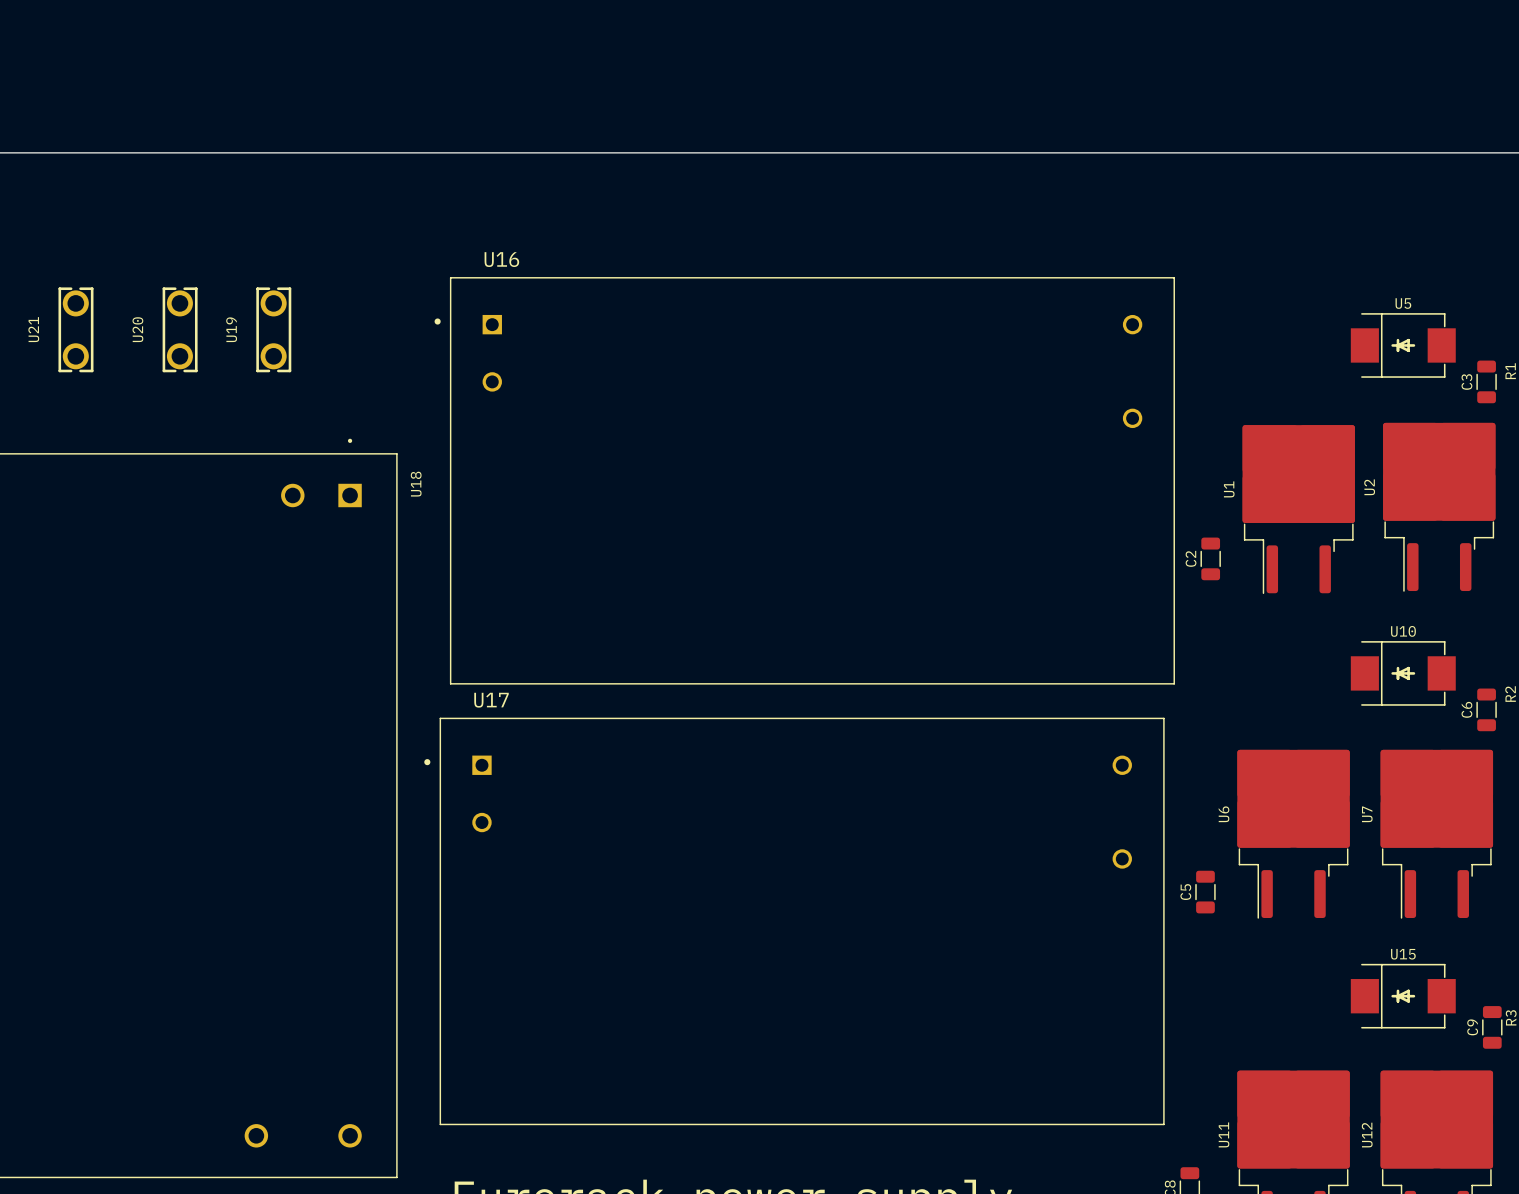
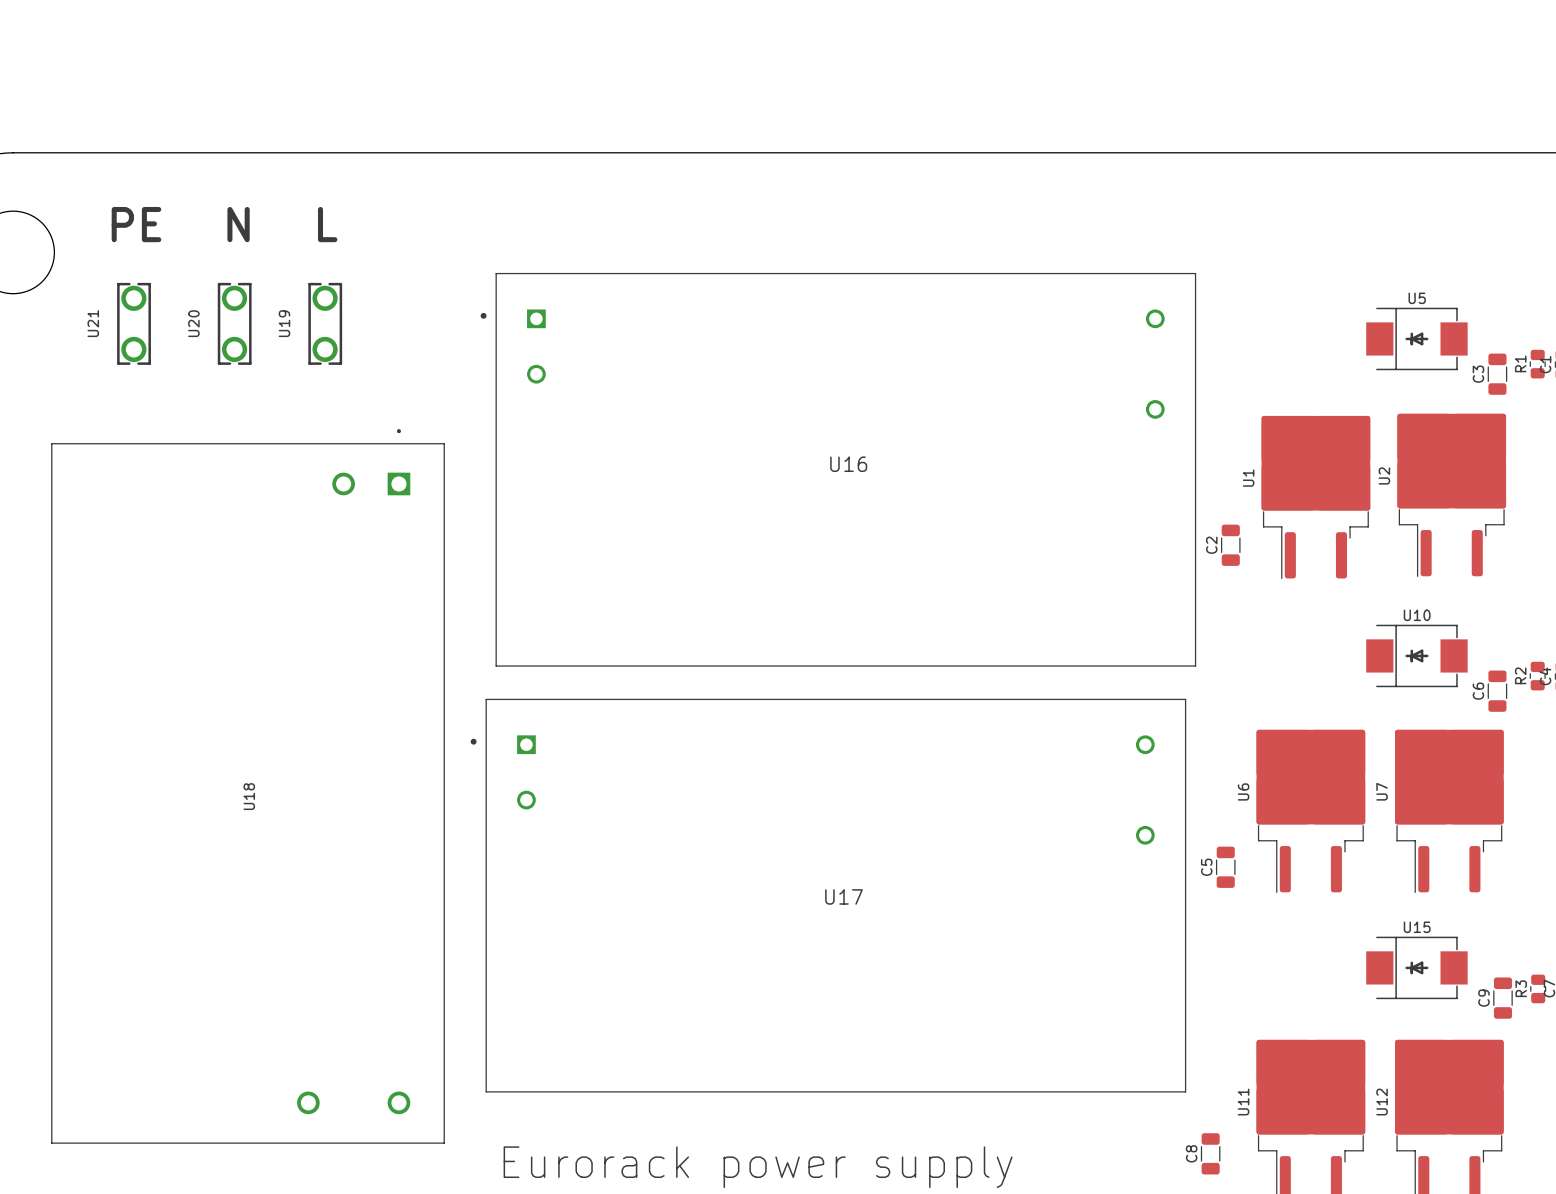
text: none -> PE (136, 224)
text: none -> N (238, 224)
text: none -> L (327, 224)
U16 name position: U16 (501, 259) -> U16 (848, 464)
U18 name position: U18 (416, 484) -> U18 (249, 796)
U17 name position: U17 (491, 700) -> U17 (844, 896)

